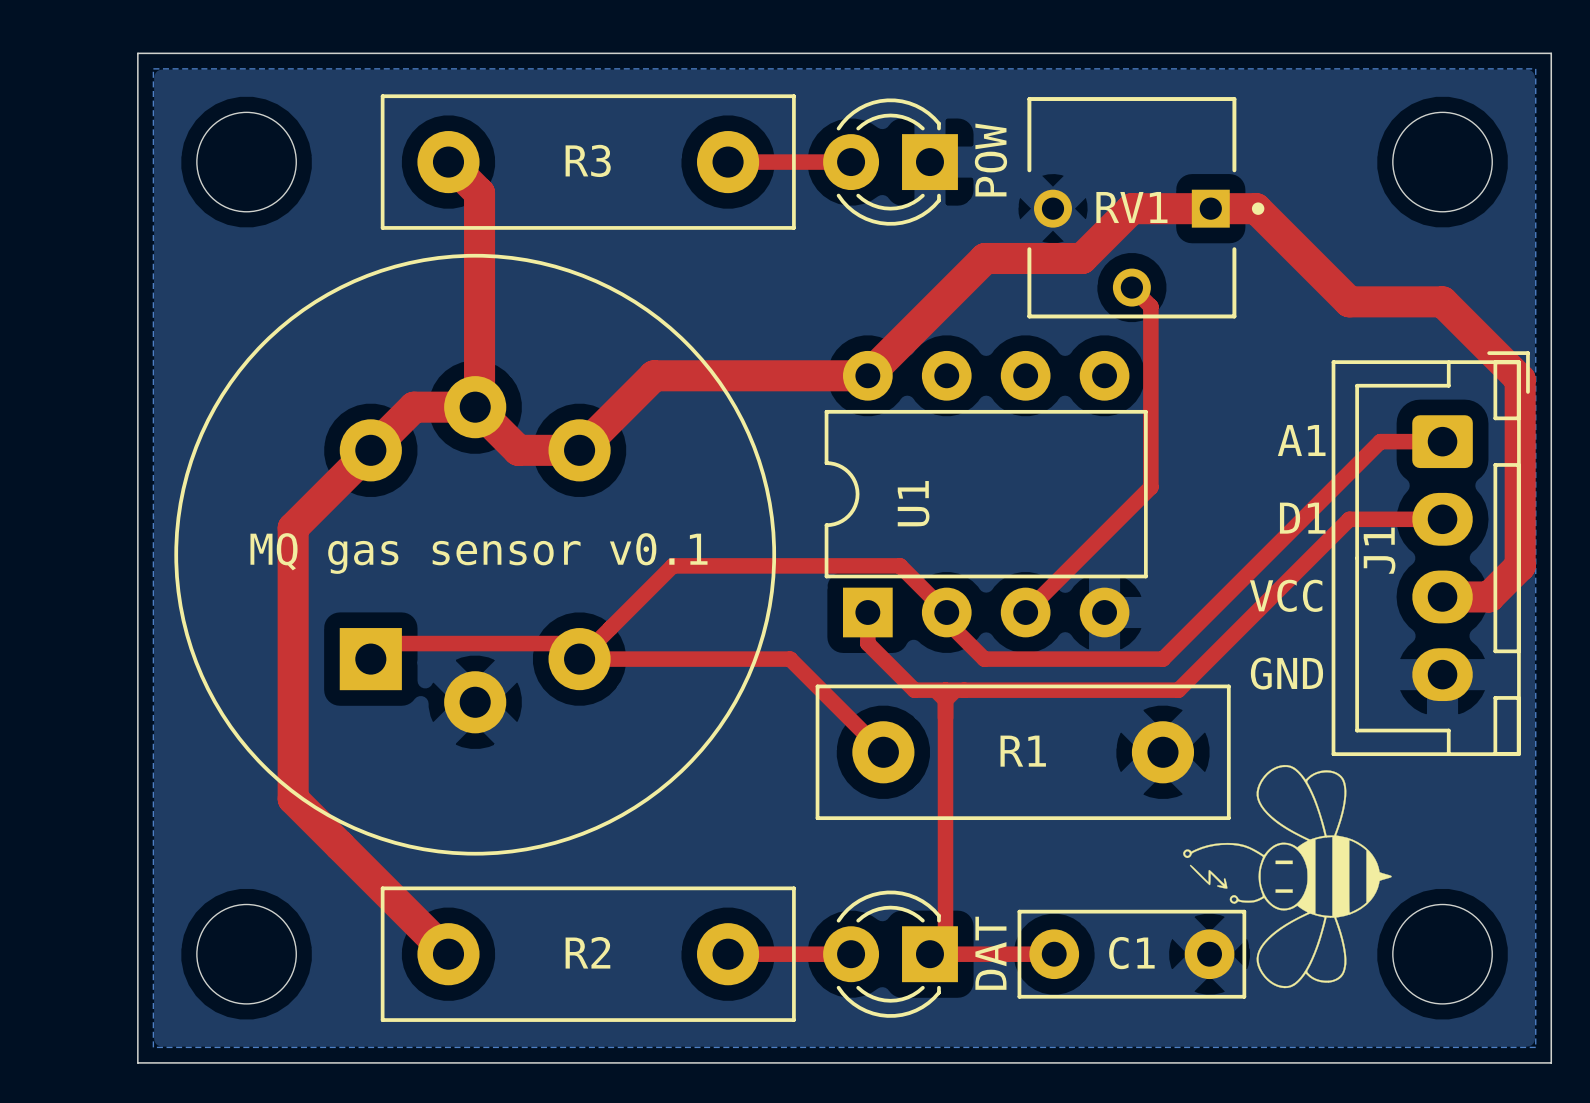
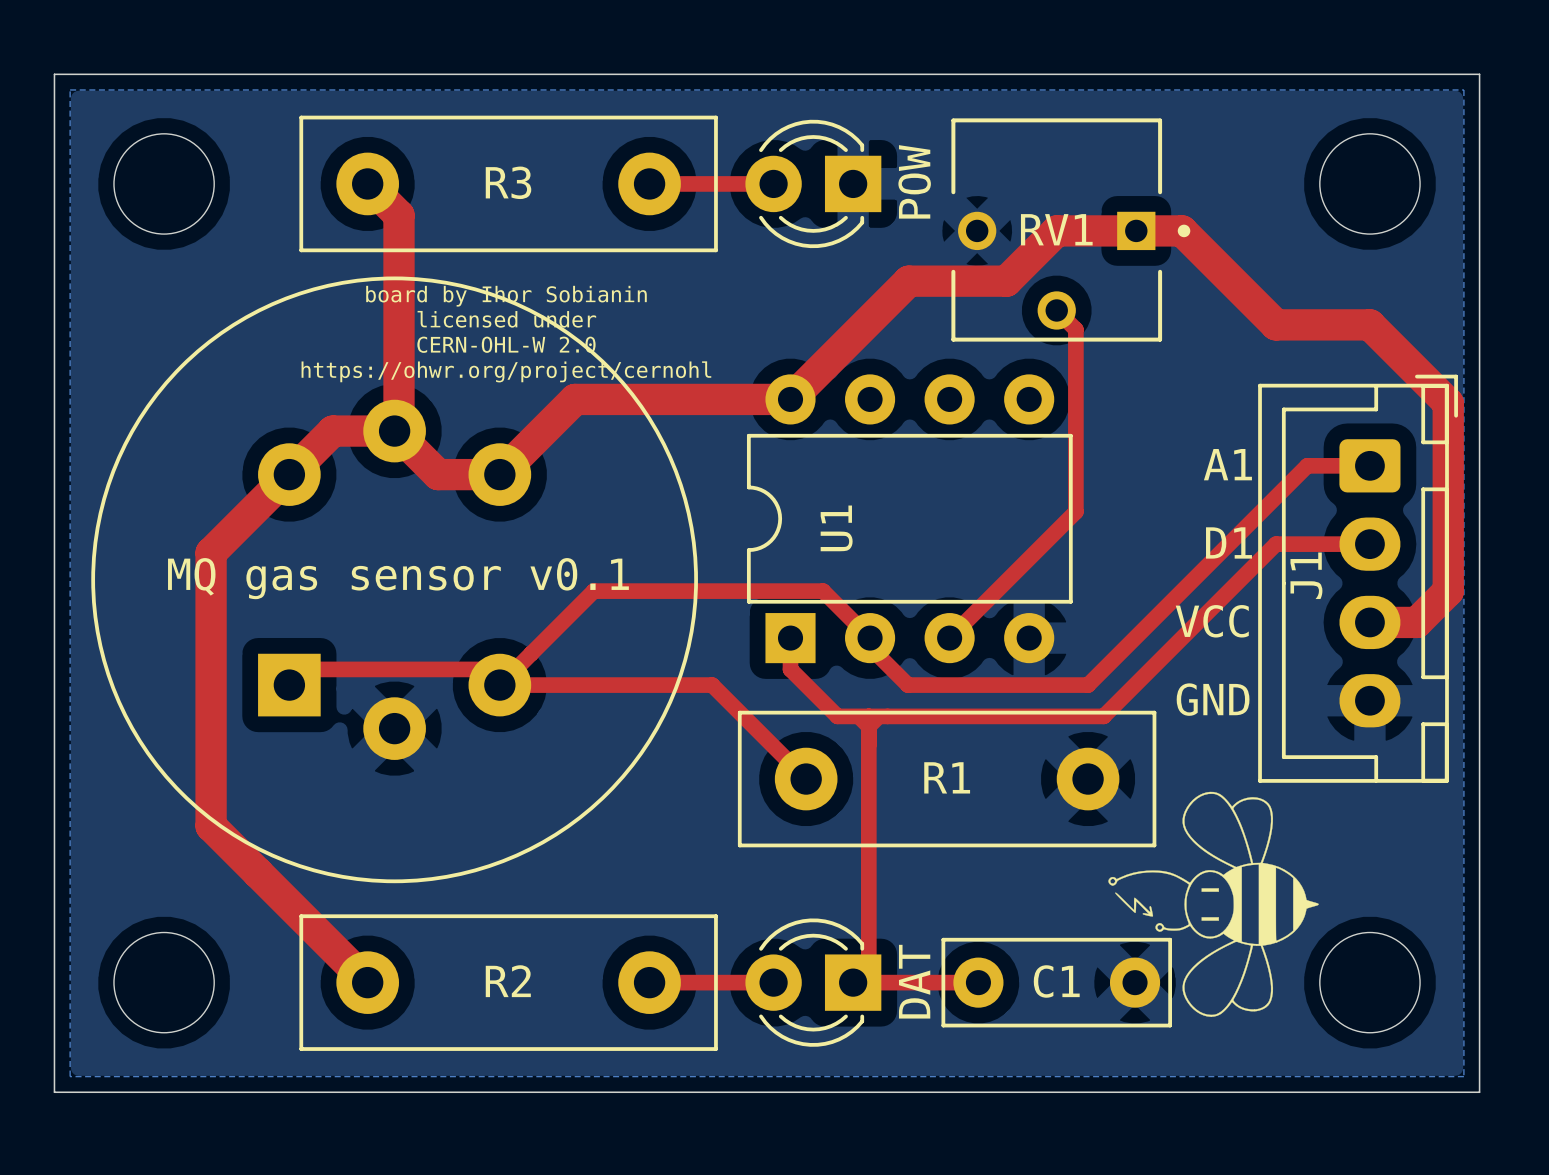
text: none -> board by Ihor Sobianin (506, 296)
text: none -> licensed under (506, 319)
text: none -> CERN-OHL-W 2.0 (506, 344)
text: none -> https://ohwr.org/project/cernohl (506, 371)

